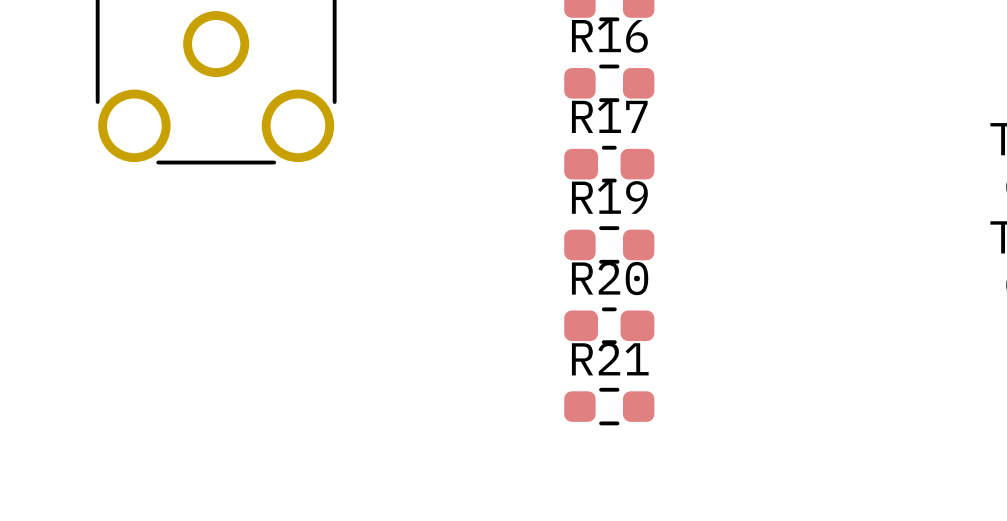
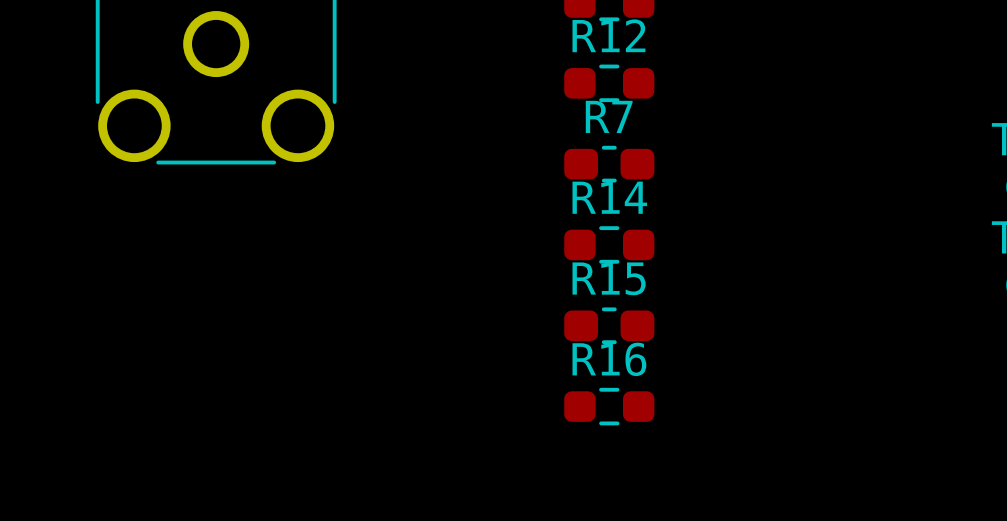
R16 name: R16 (609, 36) -> R12 (608, 35)
R17 name: R17 (609, 116) -> R7 (609, 116)
R19 name: R19 (609, 197) -> R14 (609, 197)
R20 name: R20 (610, 278) -> R15 (609, 278)
R21 name: R21 (610, 359) -> R16 (609, 359)

